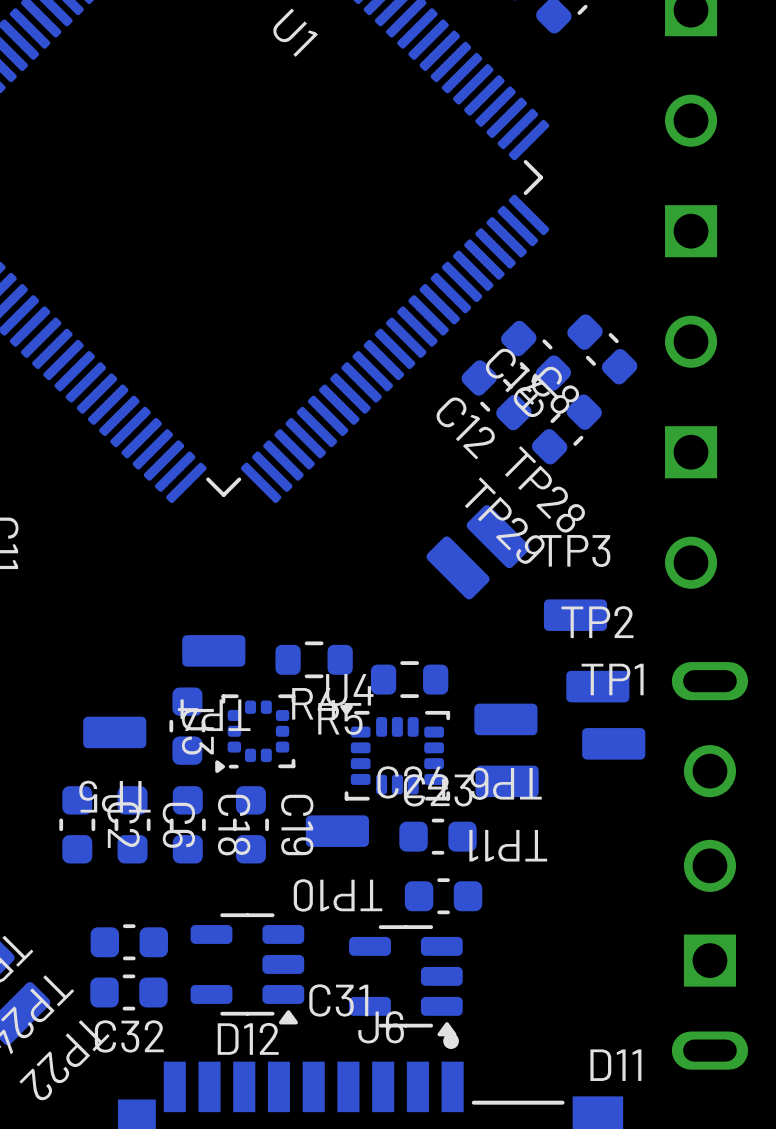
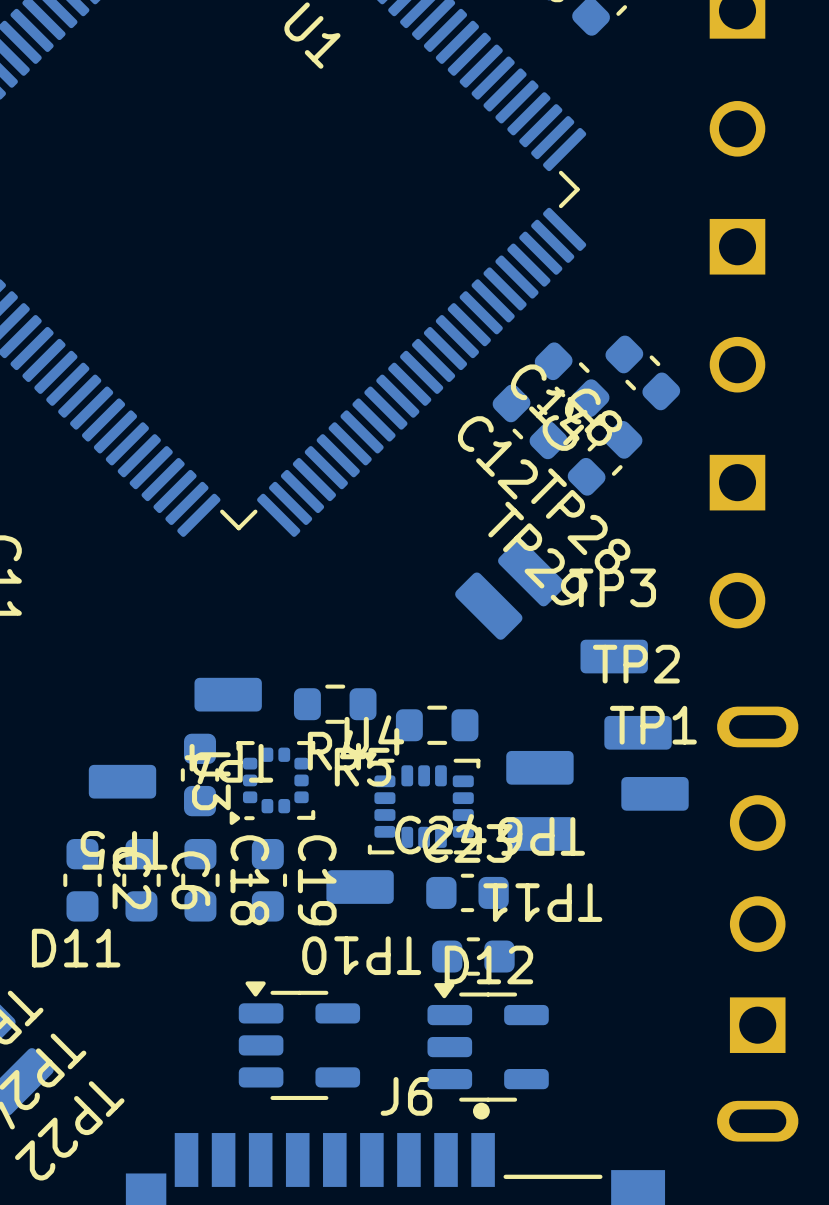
C31: (129, 942) -> none
D12 rotation: 0° (247, 968) -> 180° (488, 1042)
D12 position: (247, 968) -> (488, 1042)
D11 rotation: 0° (405, 980) -> 180° (299, 1040)
D11 position: (405, 980) -> (299, 1040)
C32: (128, 992) -> none

